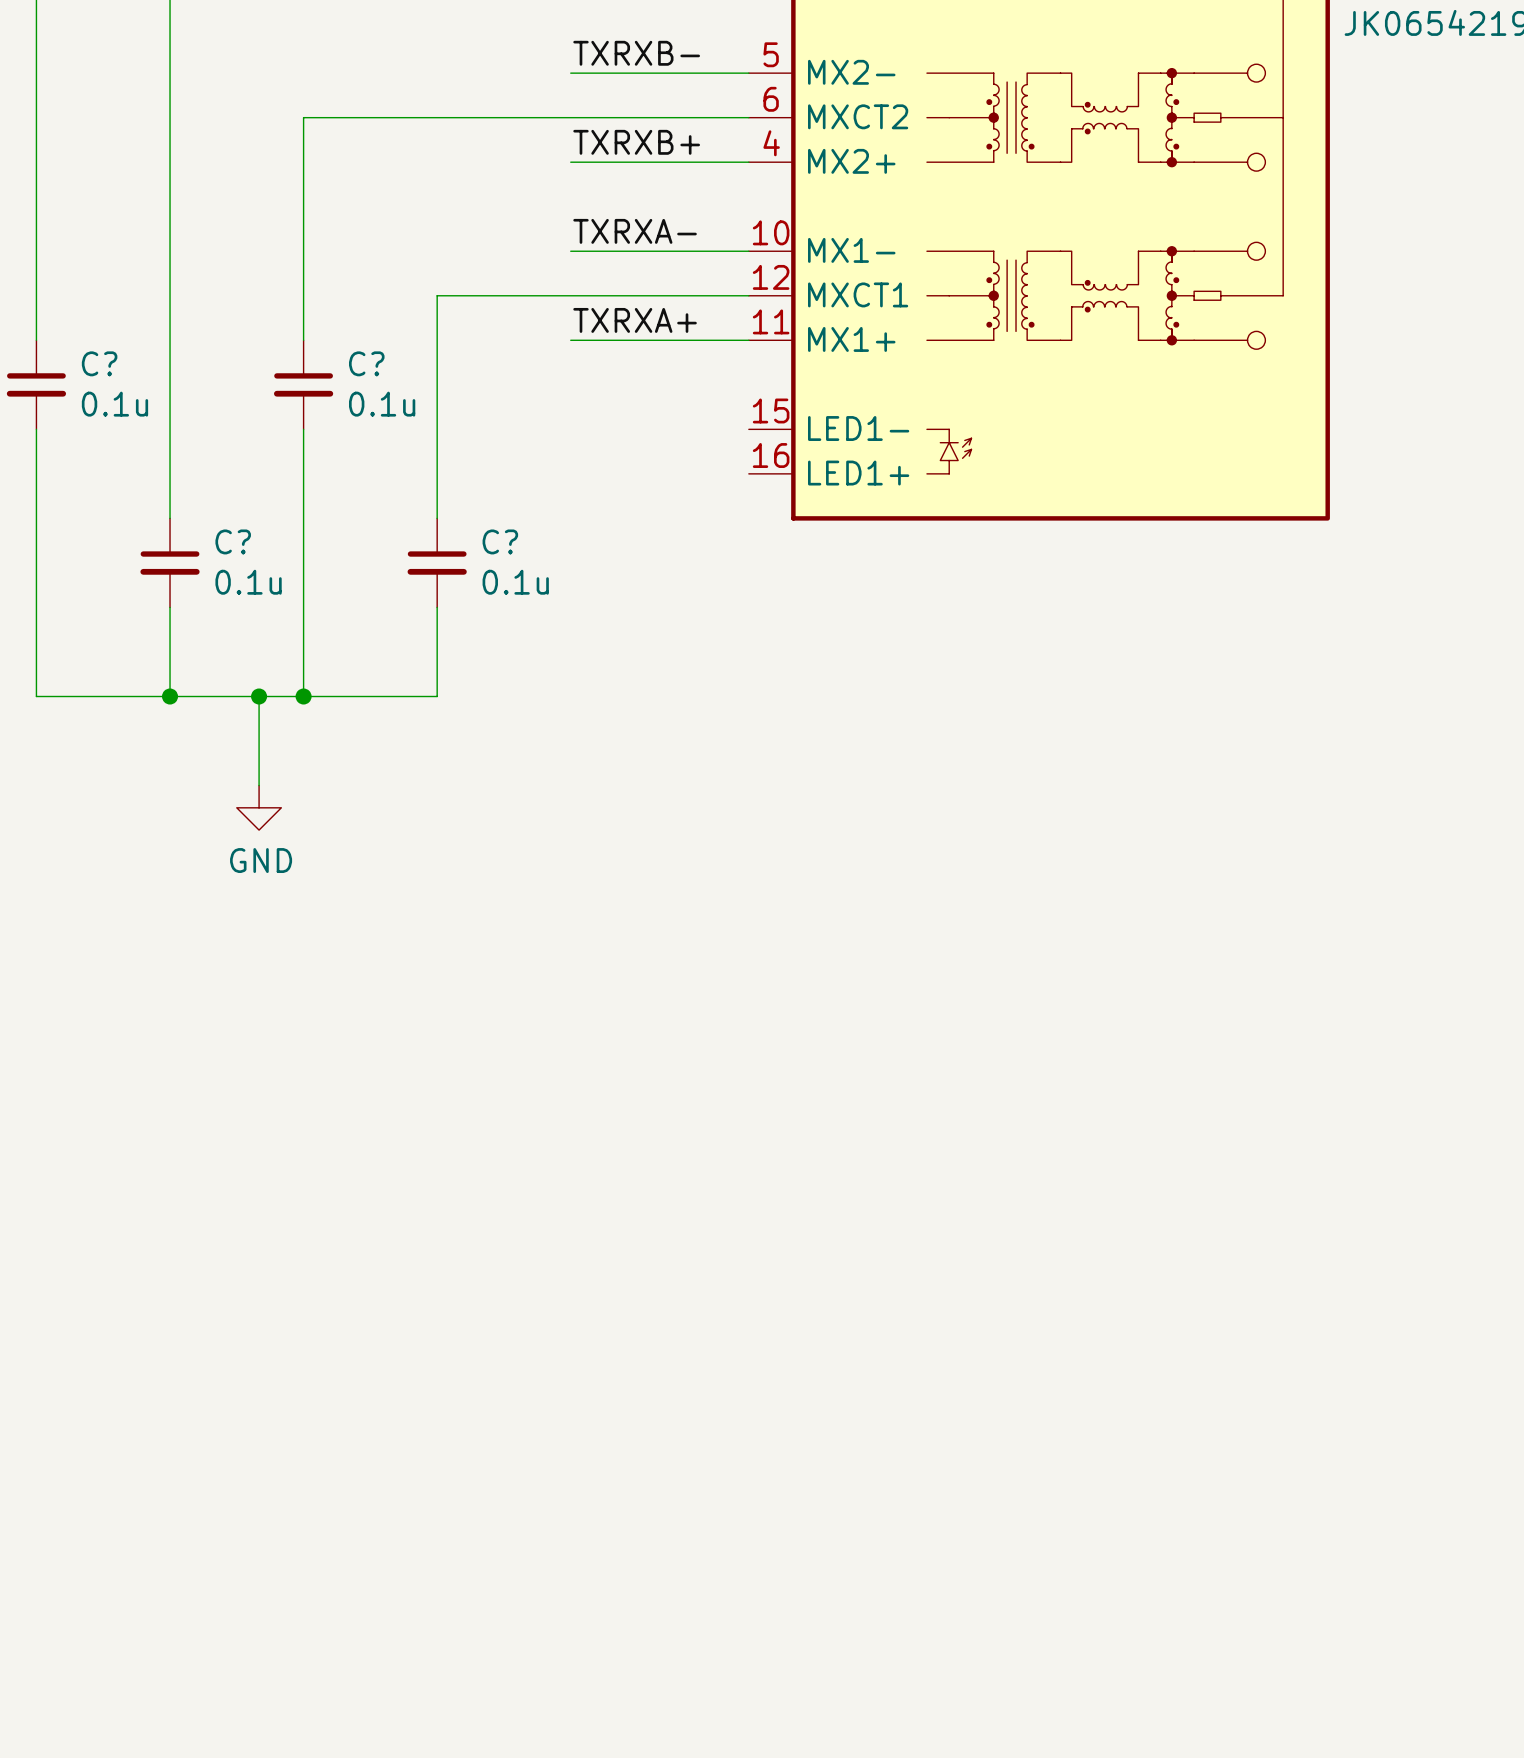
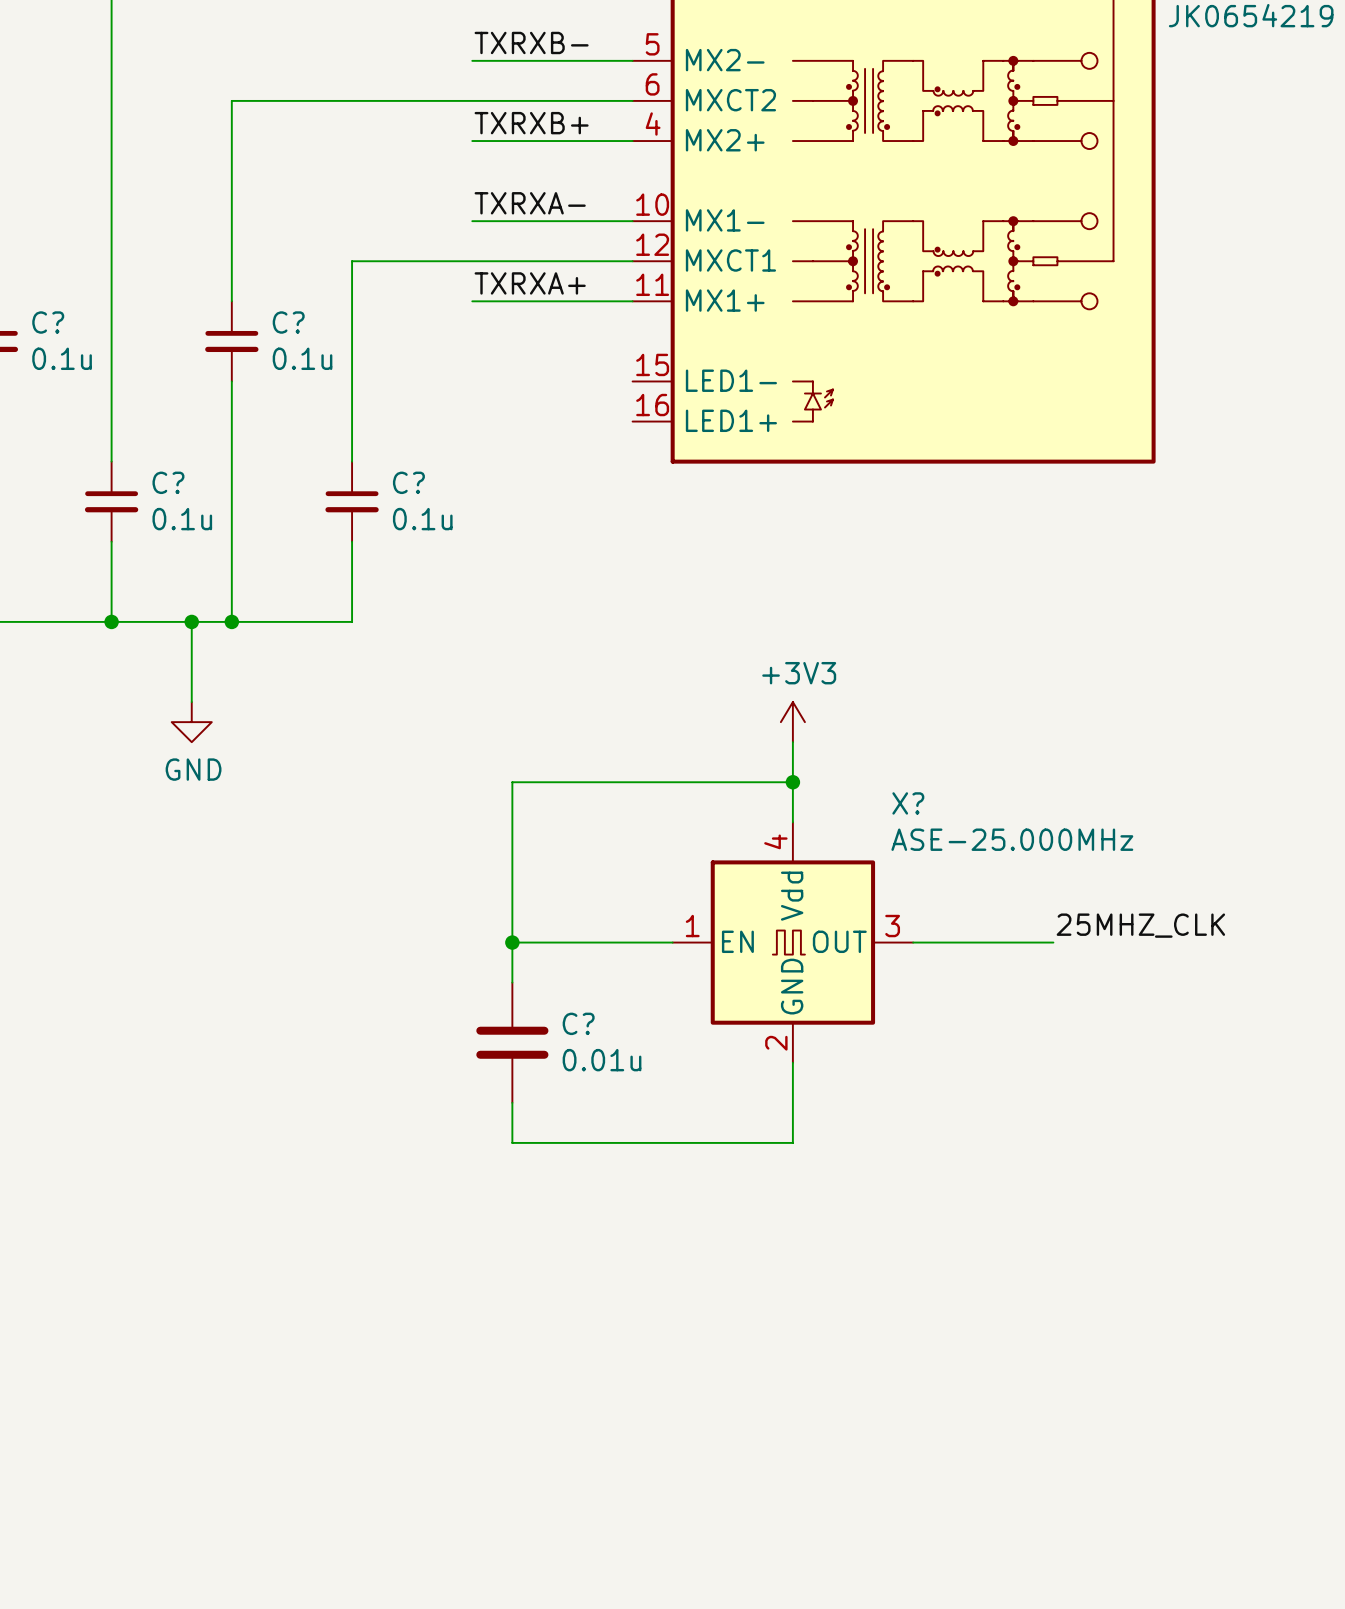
power symbol: none -> +3V3 (792, 722)
wire: none -> (792, 742) (792, 822)
wire: none -> (792, 782) (512, 782) (512, 982)
junction: none -> (792, 782)
label: none -> 25MHZ_CLK (1140, 925)
wire: none -> (512, 942) (672, 942)
junction: none -> (512, 942)
X?: none -> ASE-25.000MHz (792, 942)
wire: none -> (913, 942) (1053, 942)
C?: none -> 0.01u (512, 1042)
wire: none -> (792, 1062) (792, 1142) (512, 1142) (512, 1102)

